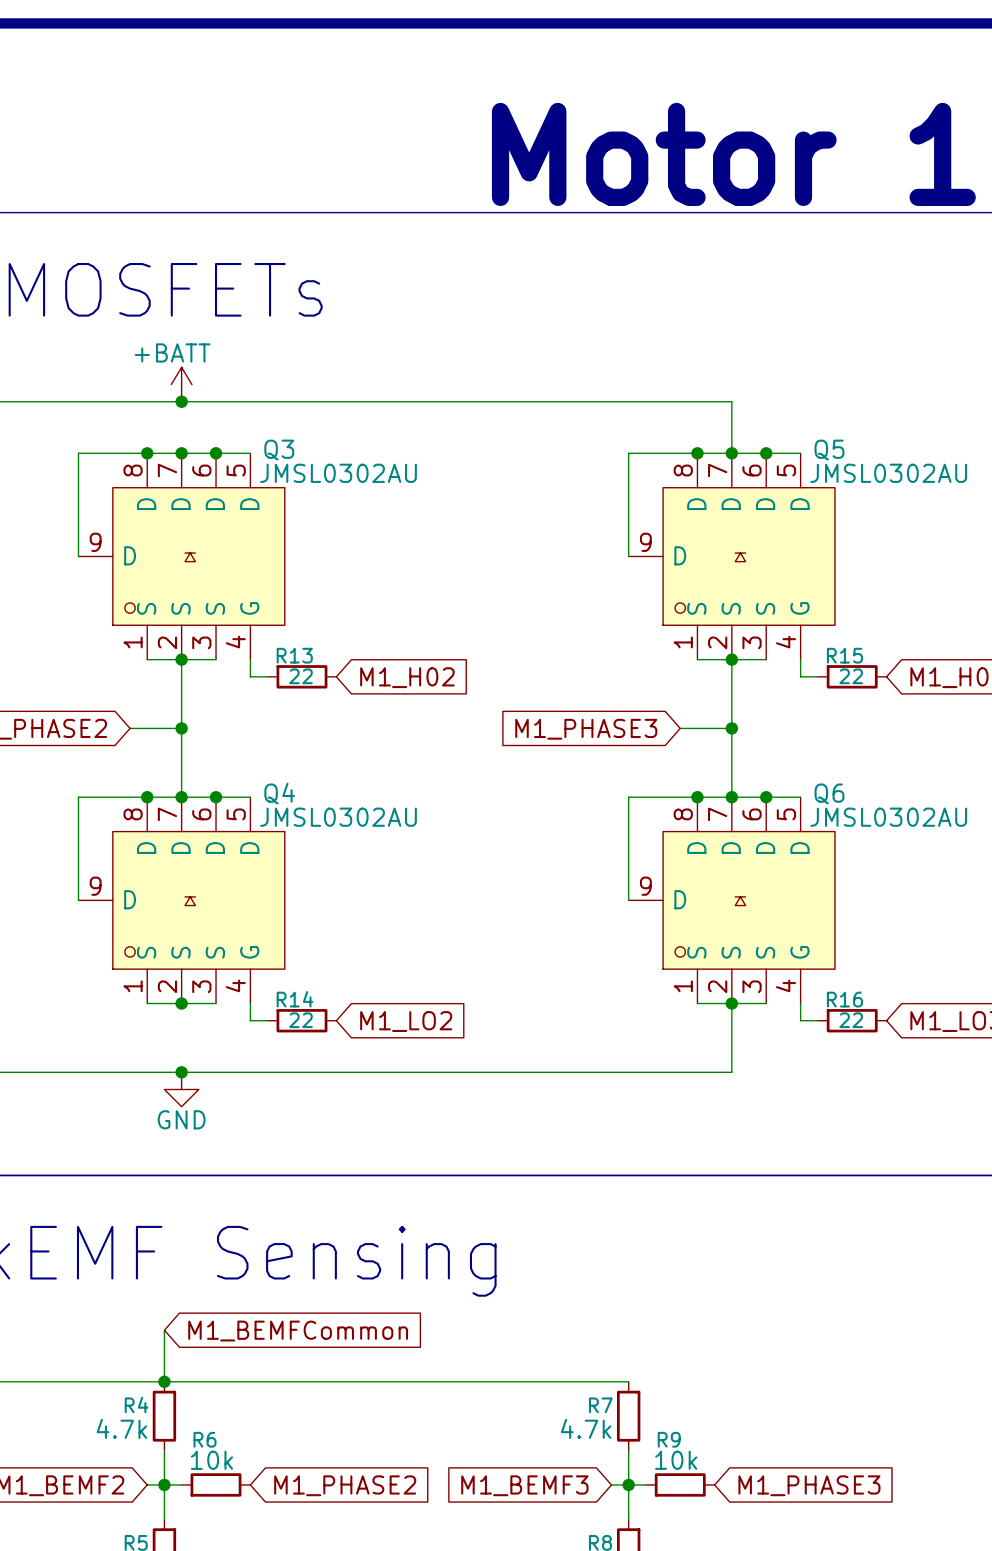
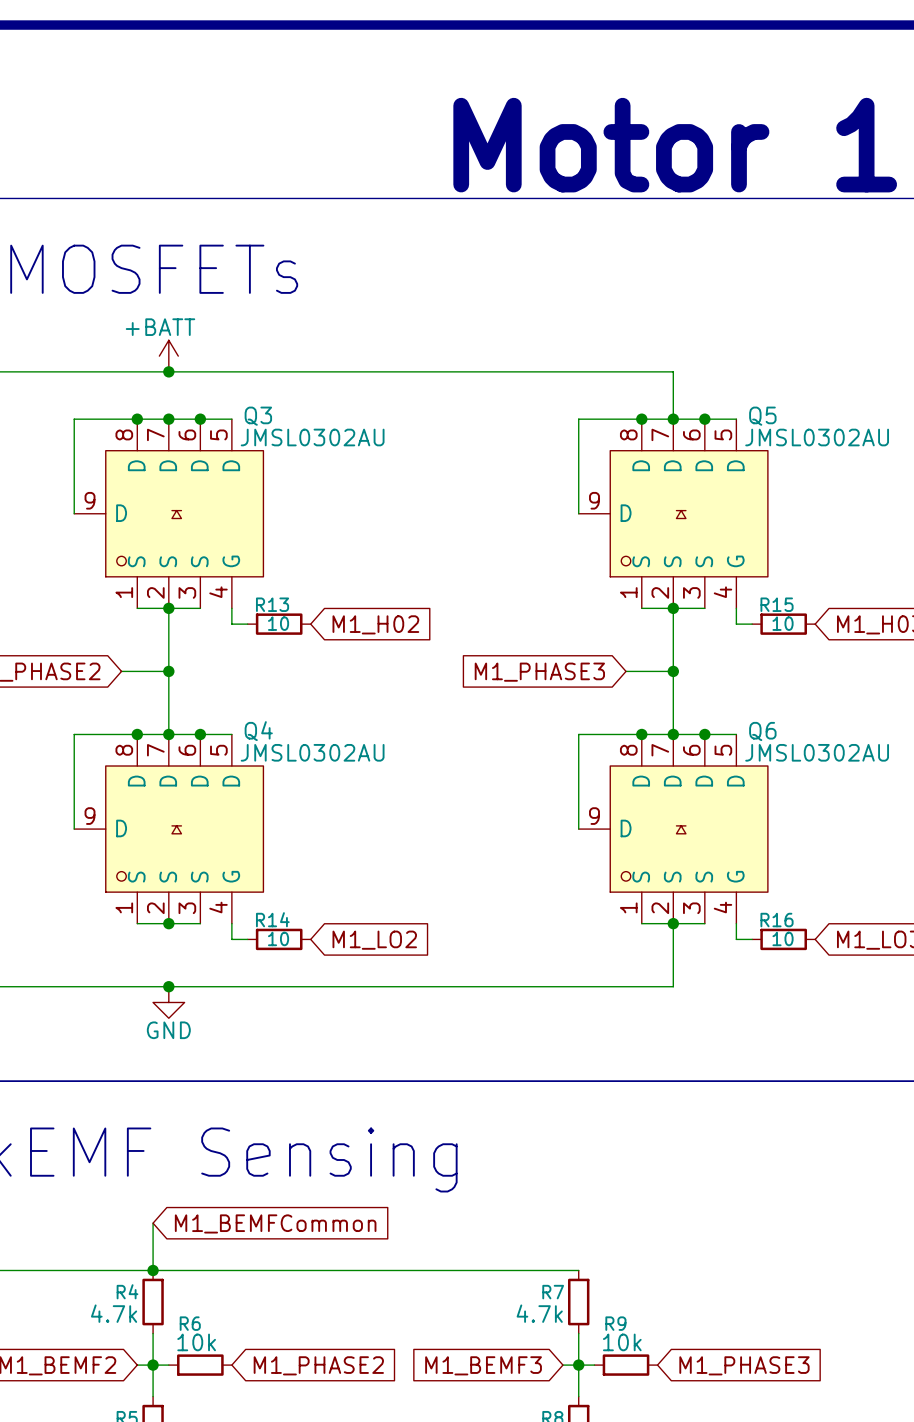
R13 value: 22 (300, 676) -> 10 (278, 623)
R15 value: 22 (851, 676) -> 10 (783, 623)
R14 value: 22 (300, 1020) -> 10 (278, 938)
R16 value: 22 (851, 1020) -> 10 (783, 938)

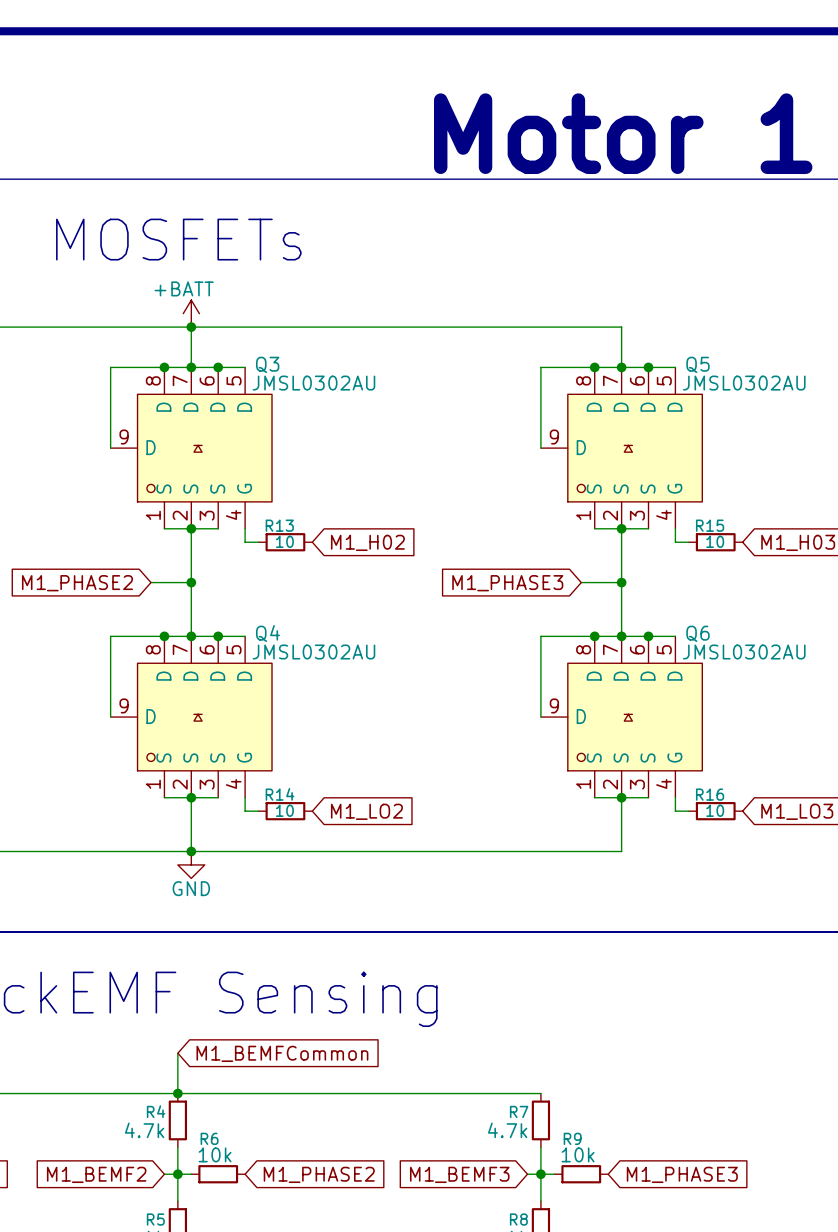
wire: none -> (191, 327) (191, 367)
wire: none -> (191, 797) (191, 851)

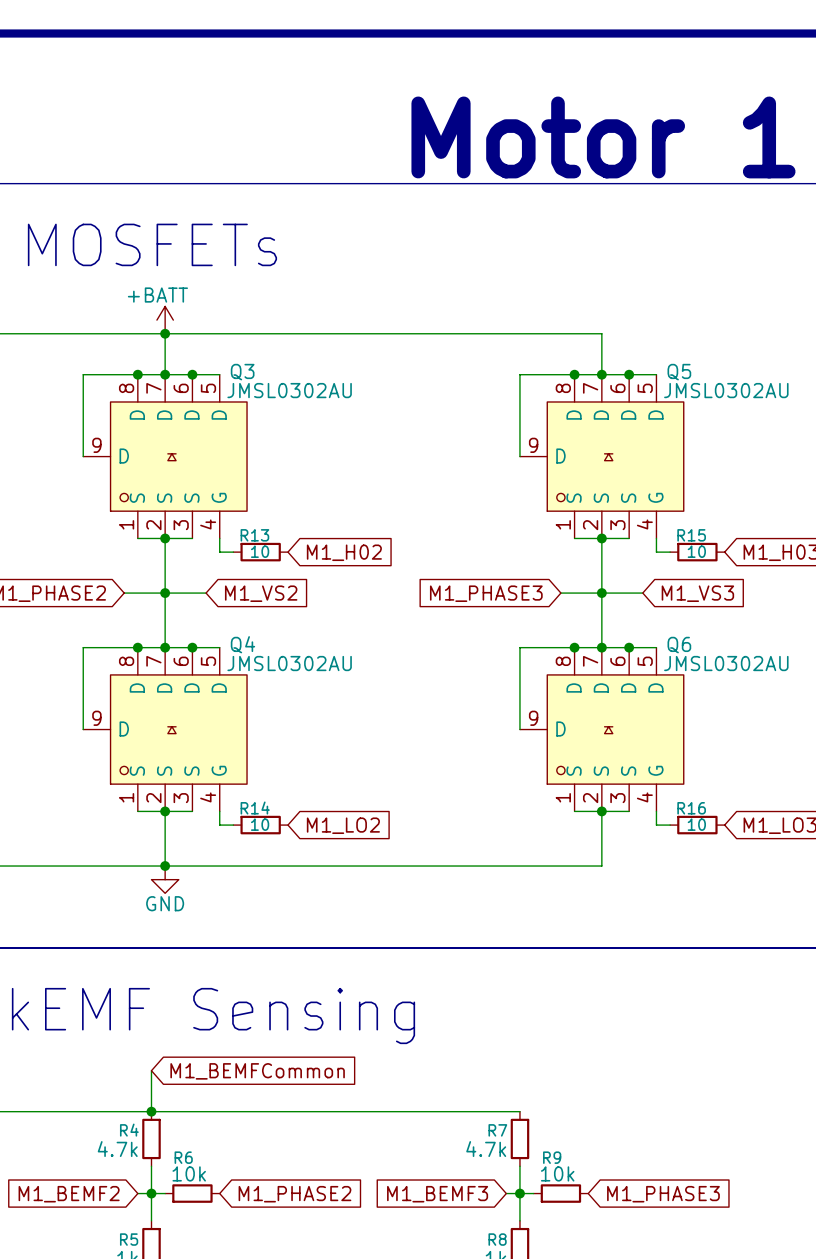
wire: none -> (165, 593) (206, 593)
wire: none -> (601, 593) (642, 593)
global label: none -> M1_VS2 (261, 593)
global label: none -> M1_VS3 (697, 593)

